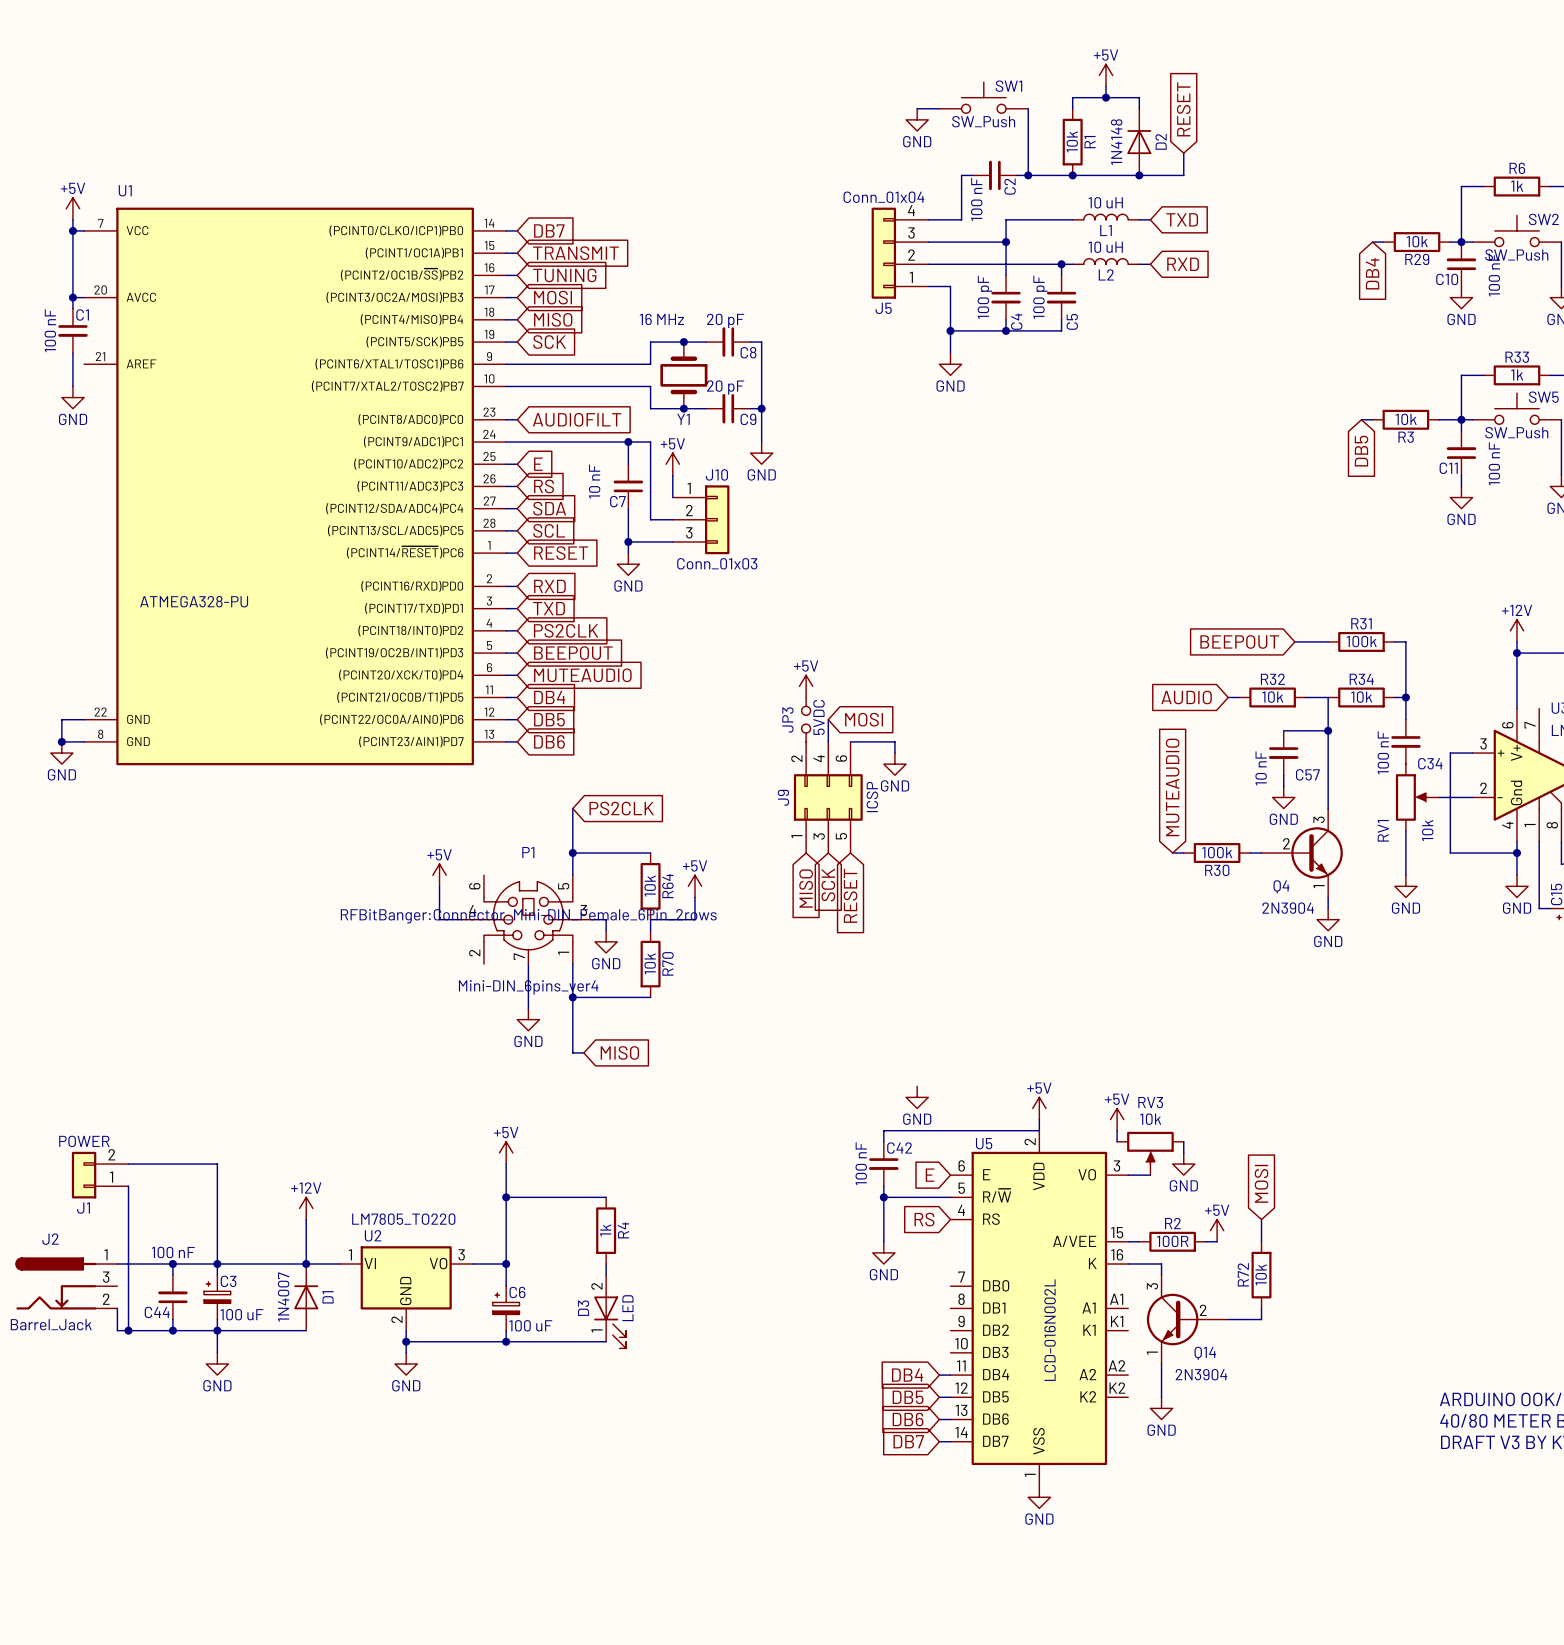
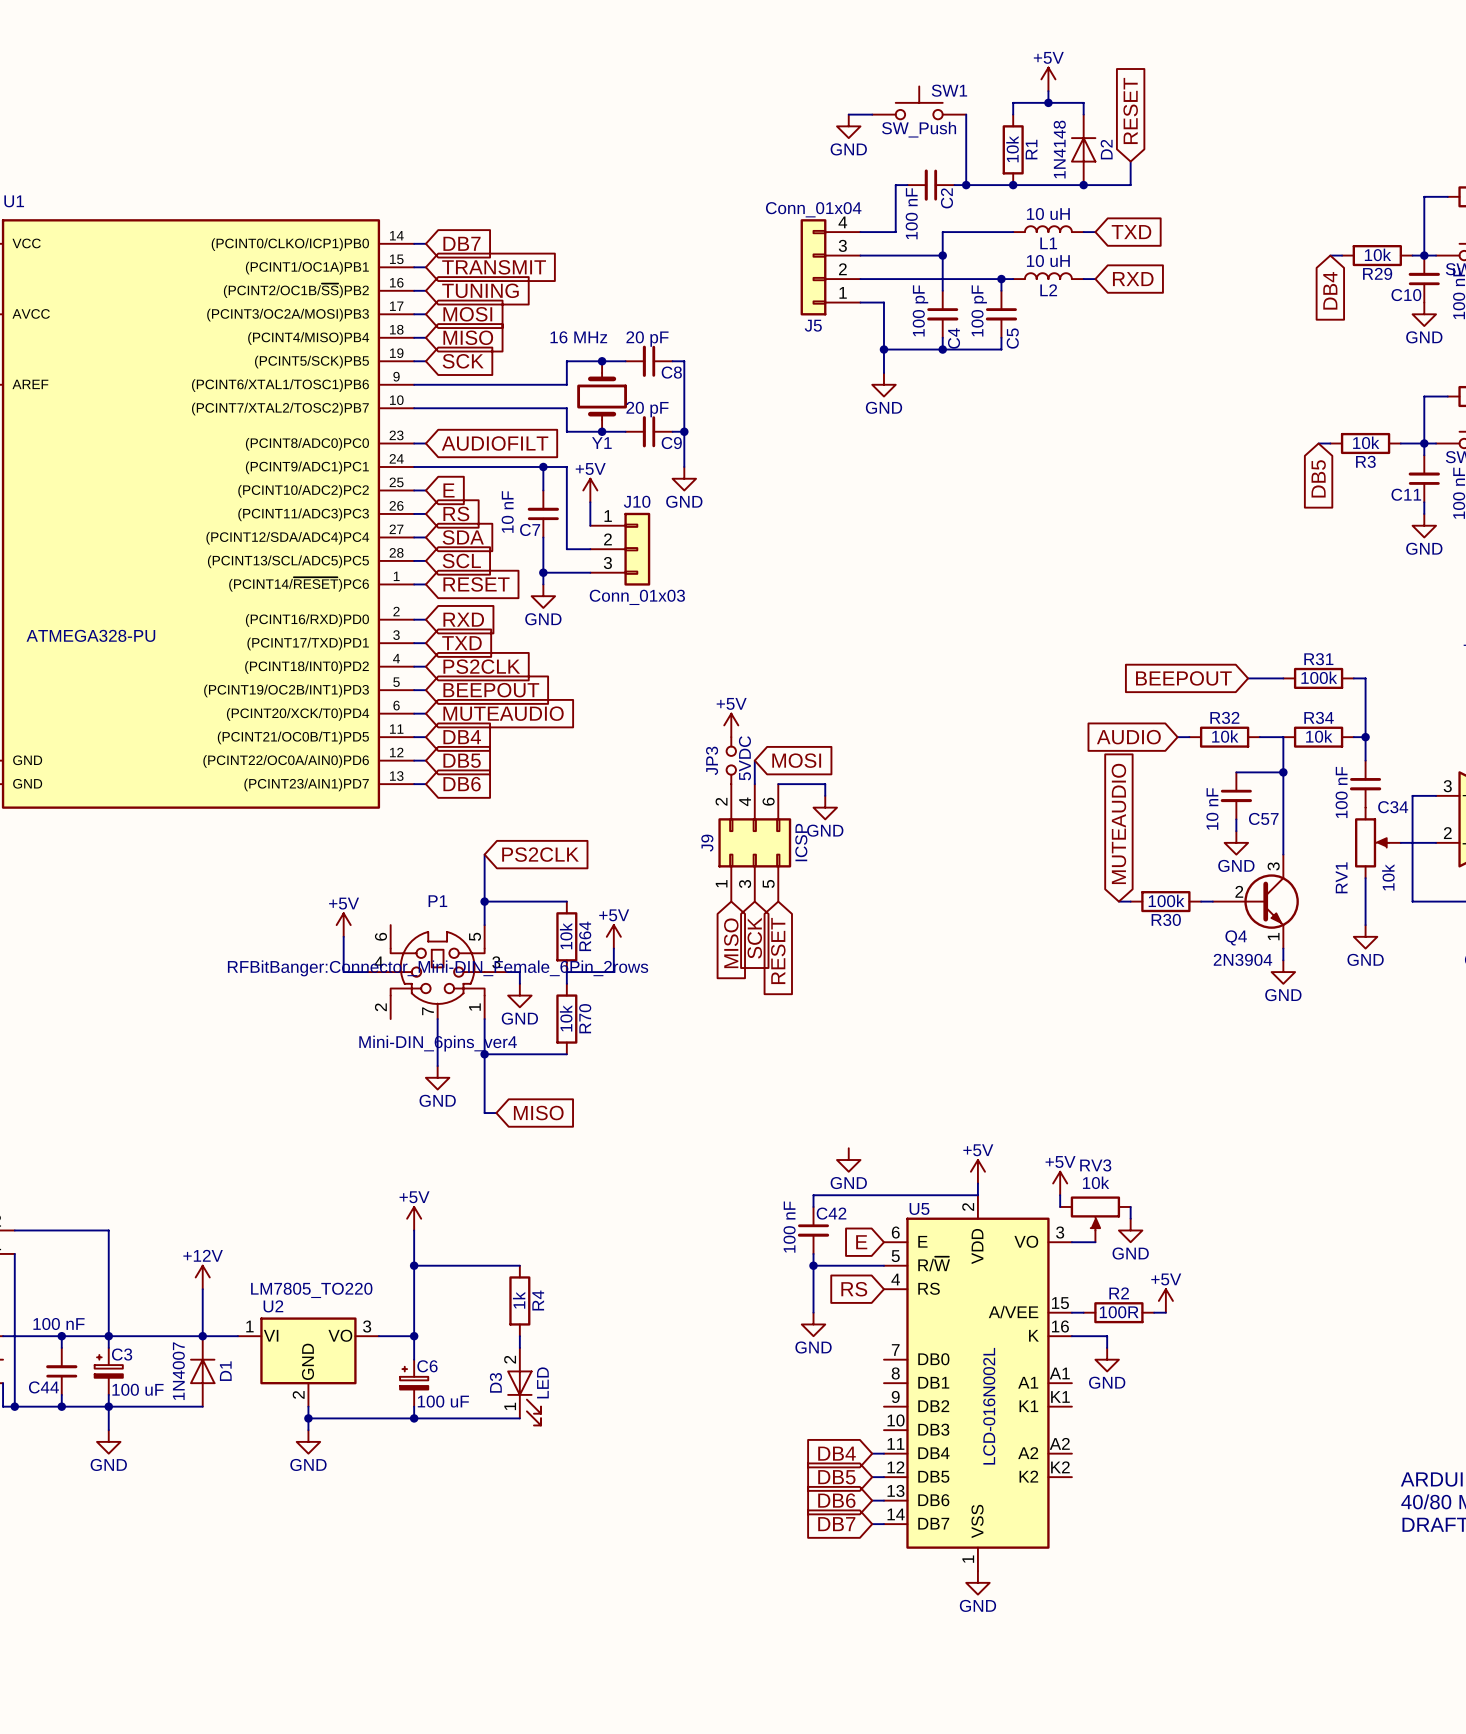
global label: MOSI (1261, 1183) -> none
wire: (1261, 1219) (1261, 1241) -> none
R72: 10k (1261, 1275) -> none
wire: (1261, 1308) (1261, 1319) (1228, 1319) -> none
Q14: 2N3904 (1187, 1319) -> none
wire: (1161, 1363) (1161, 1397) -> none
power symbol position: GND (1161, 1408) -> GND (1107, 1359)

